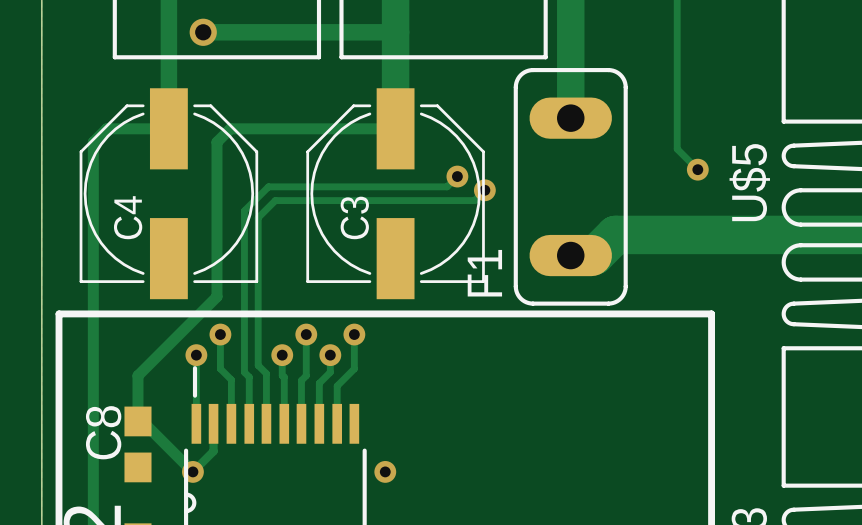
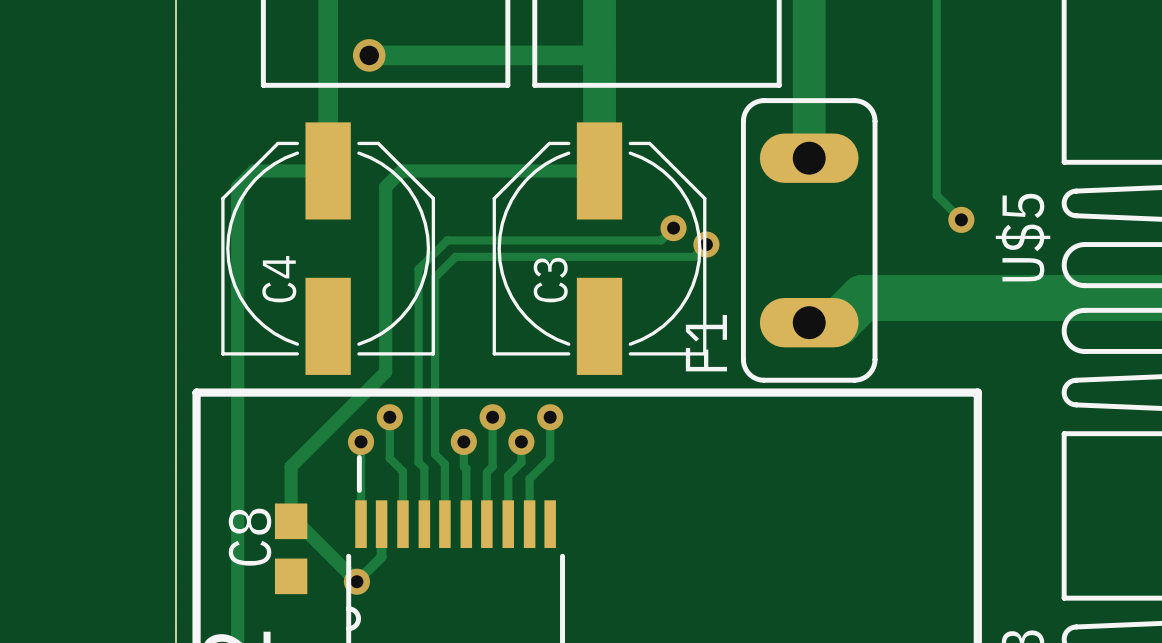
via: (385, 471) -> none

